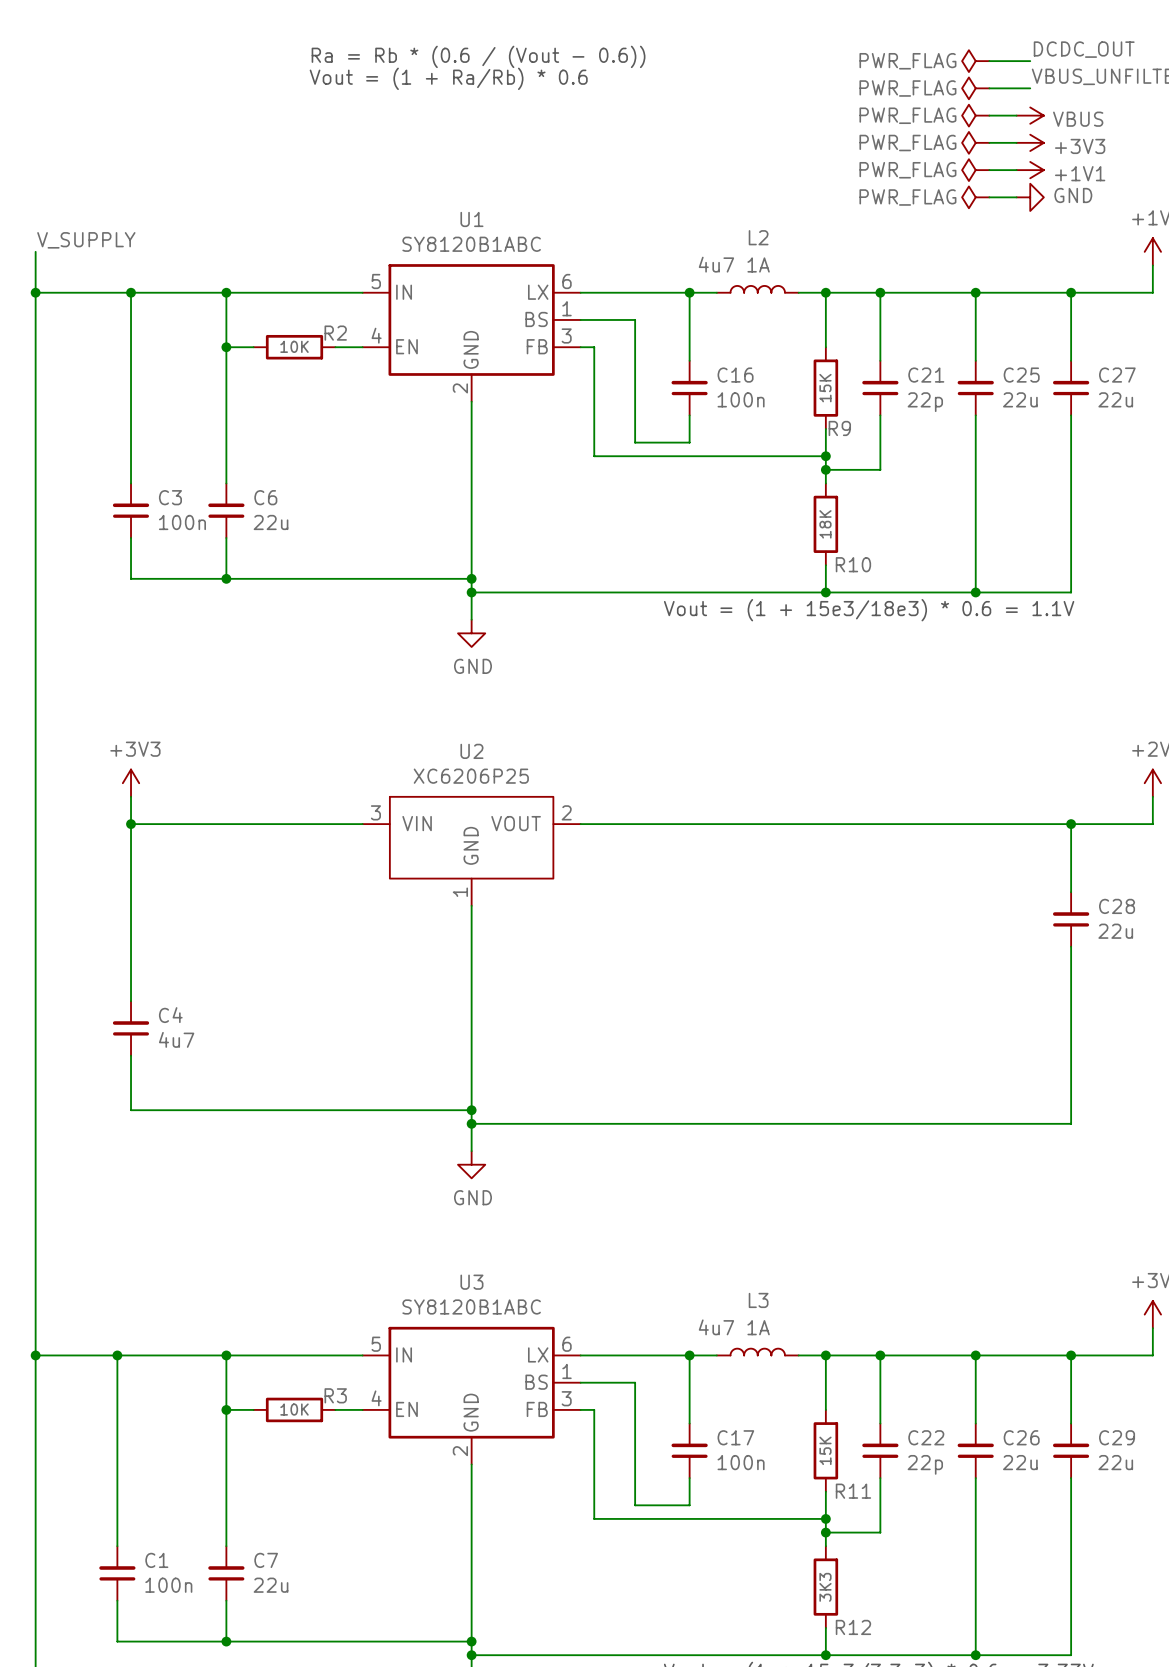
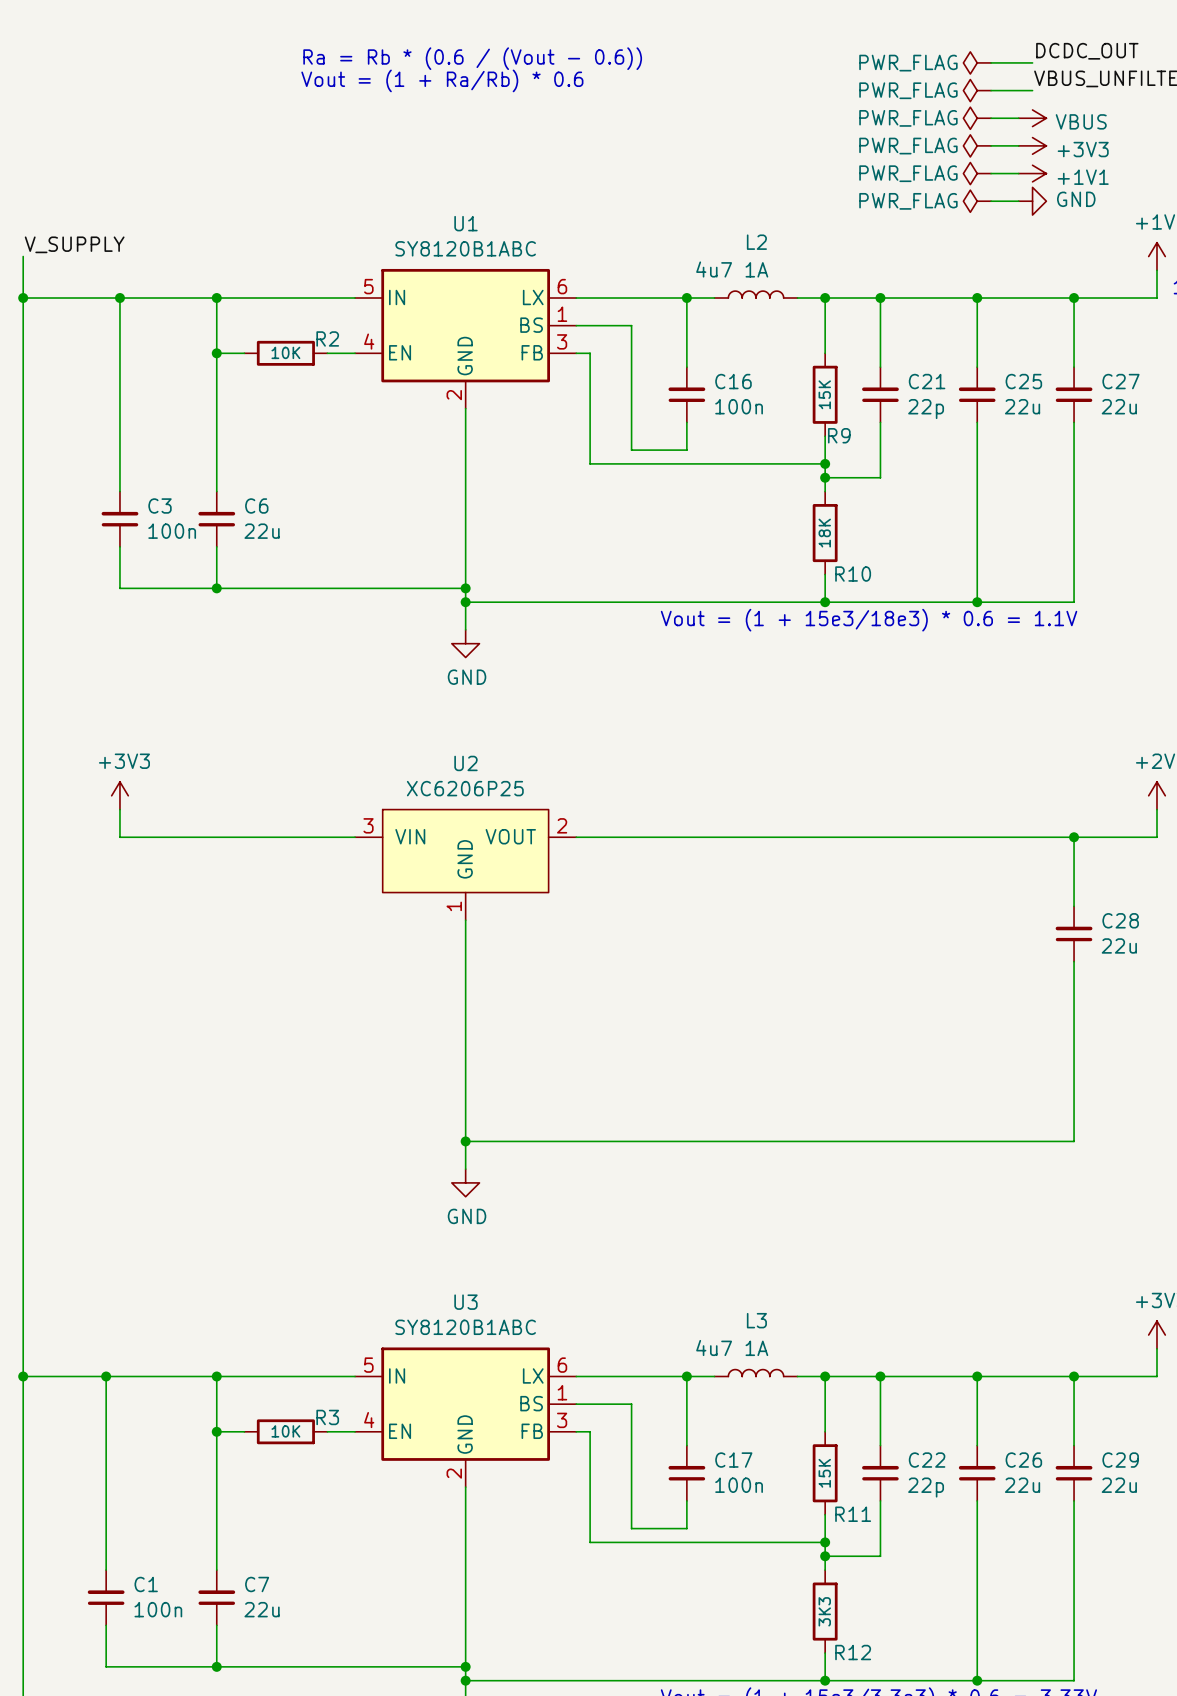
wire: (131, 824) (131, 1001) -> none
junction: (131, 824) -> none
C4: 4u7 (131, 1028) -> none
wire: (131, 1055) (131, 1110) (471, 1110) -> none
junction: (471, 1110) -> none

